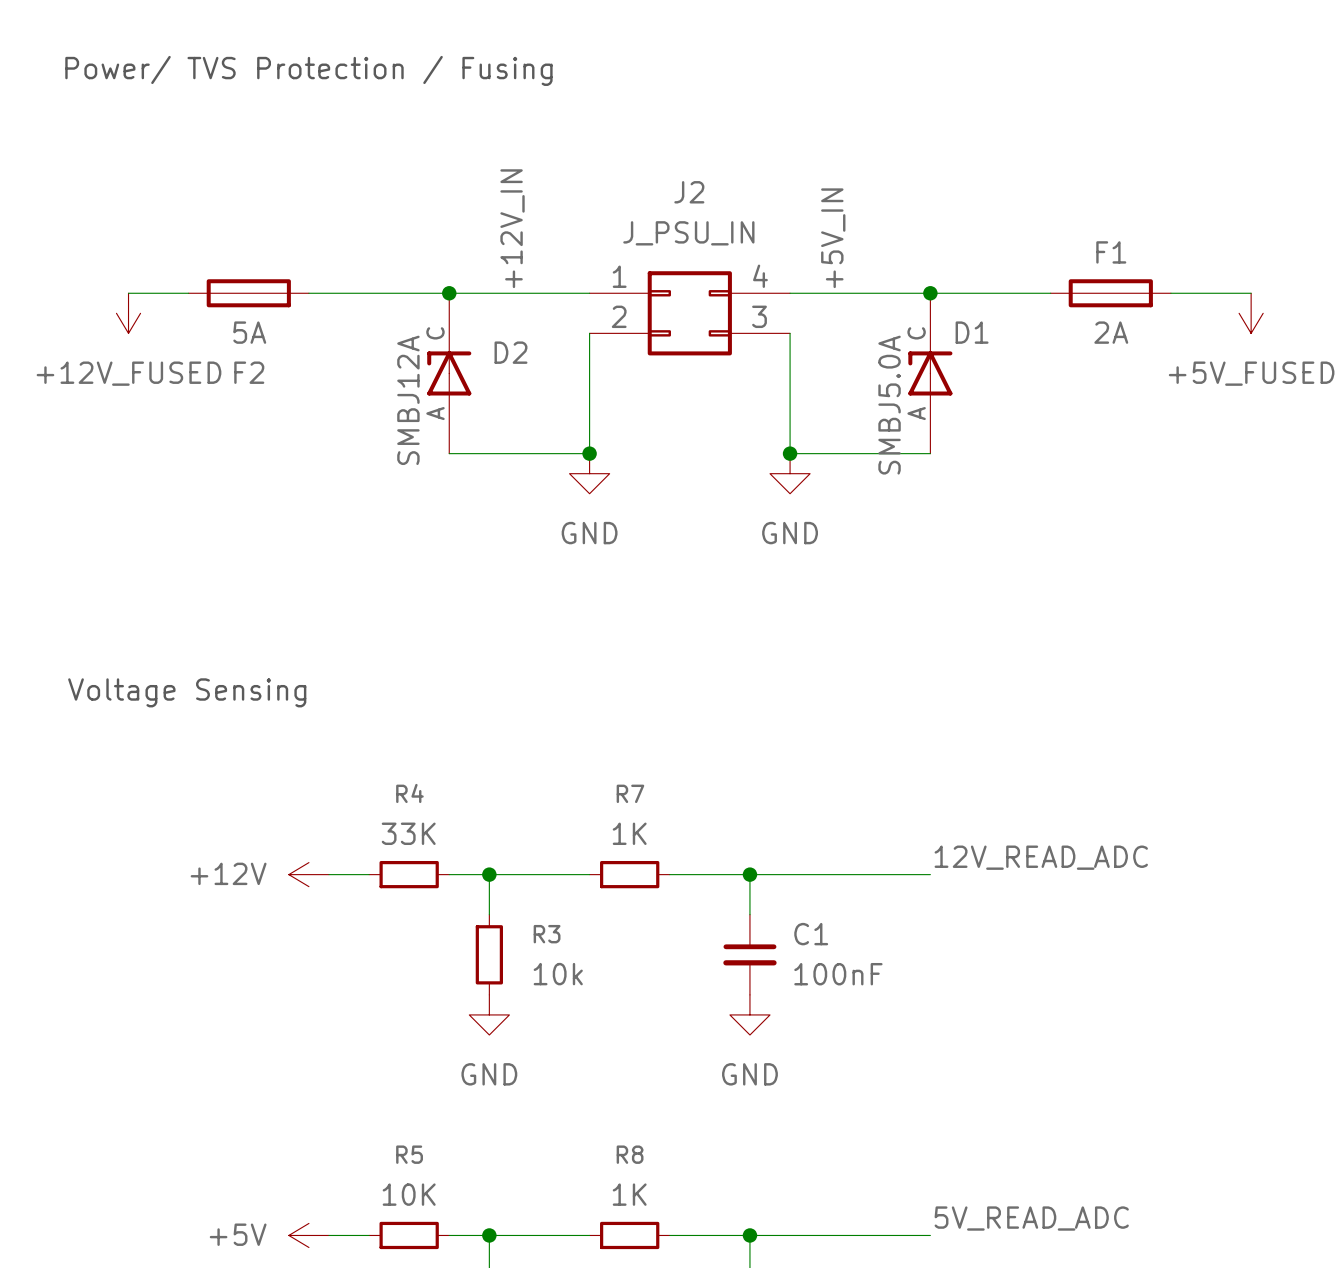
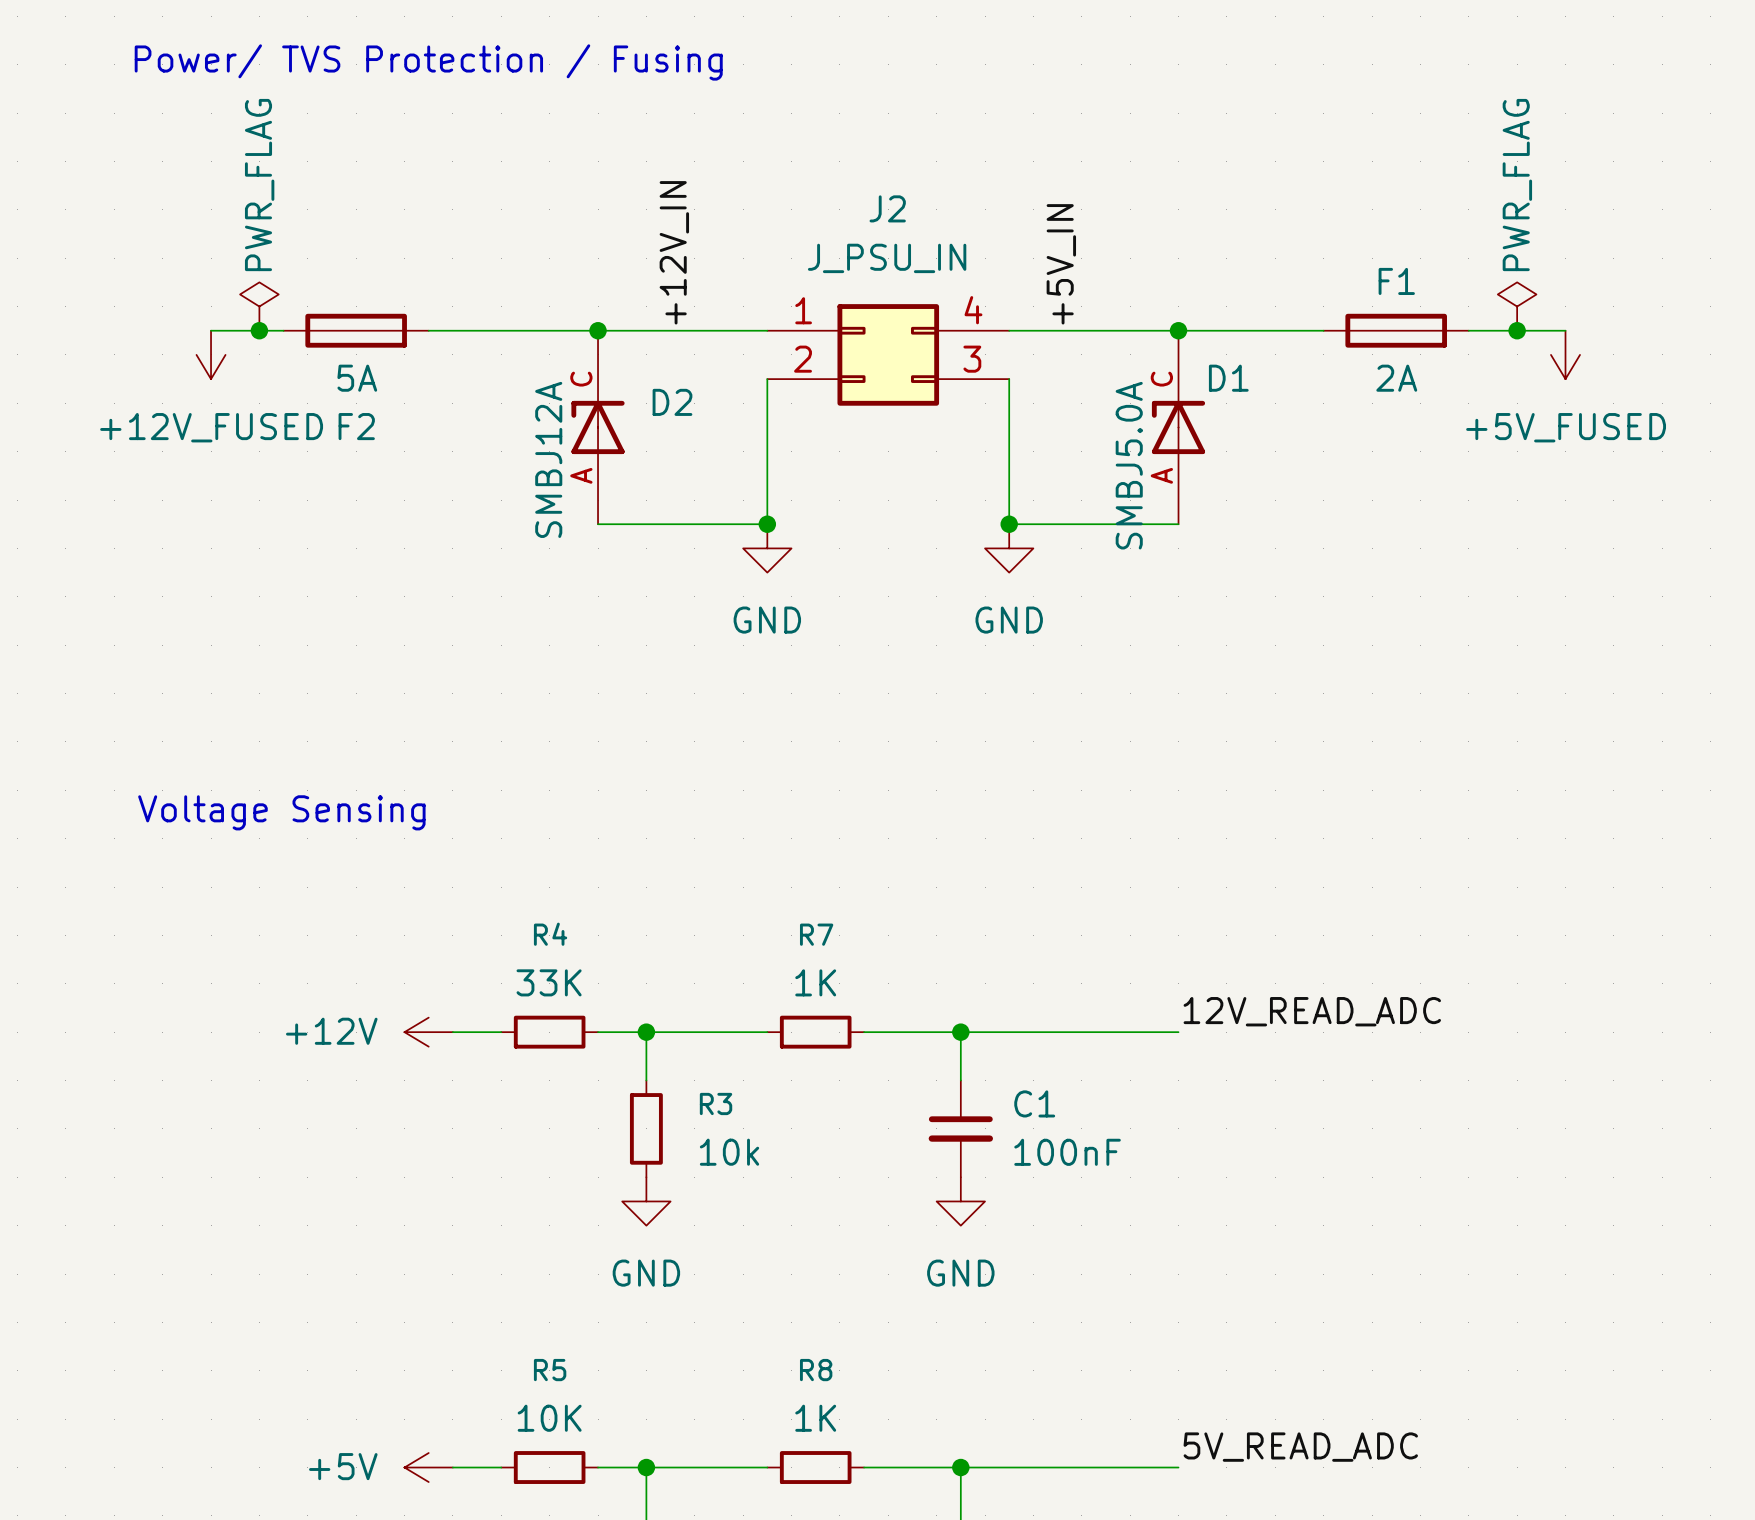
power symbol: none -> PWR_FLAG (259, 306)
power symbol: none -> PWR_FLAG (1517, 306)
junction: none -> (259, 330)
junction: none -> (1517, 330)

